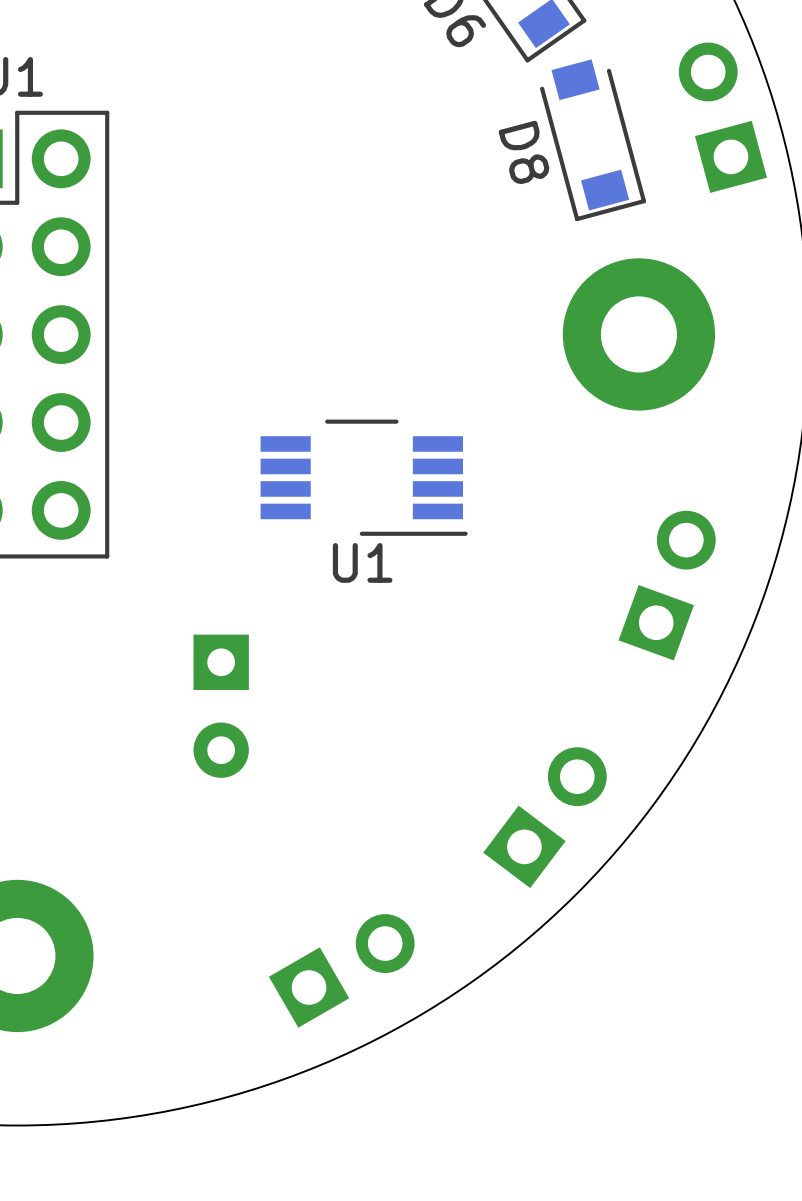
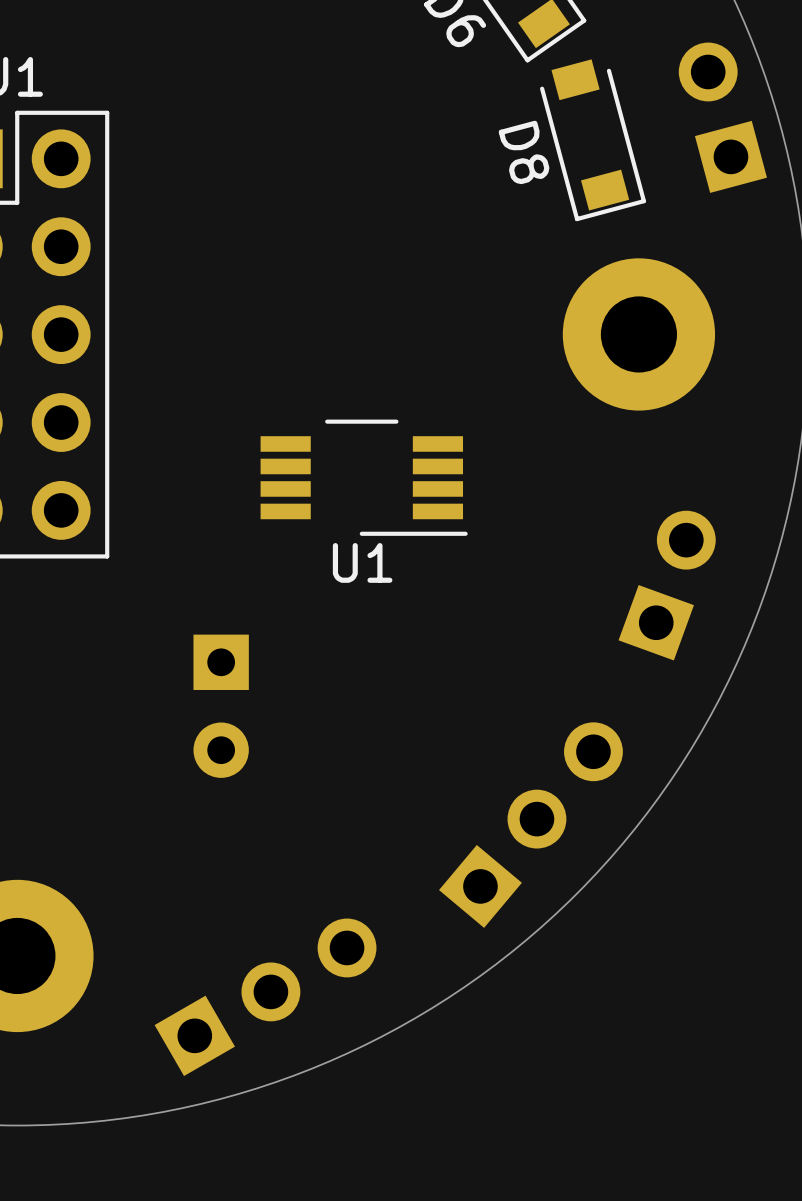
part footprint: [483, 747, 607, 889] -> [439, 722, 623, 928]
part: (341, 970) -> none
part: none -> (265, 997)

